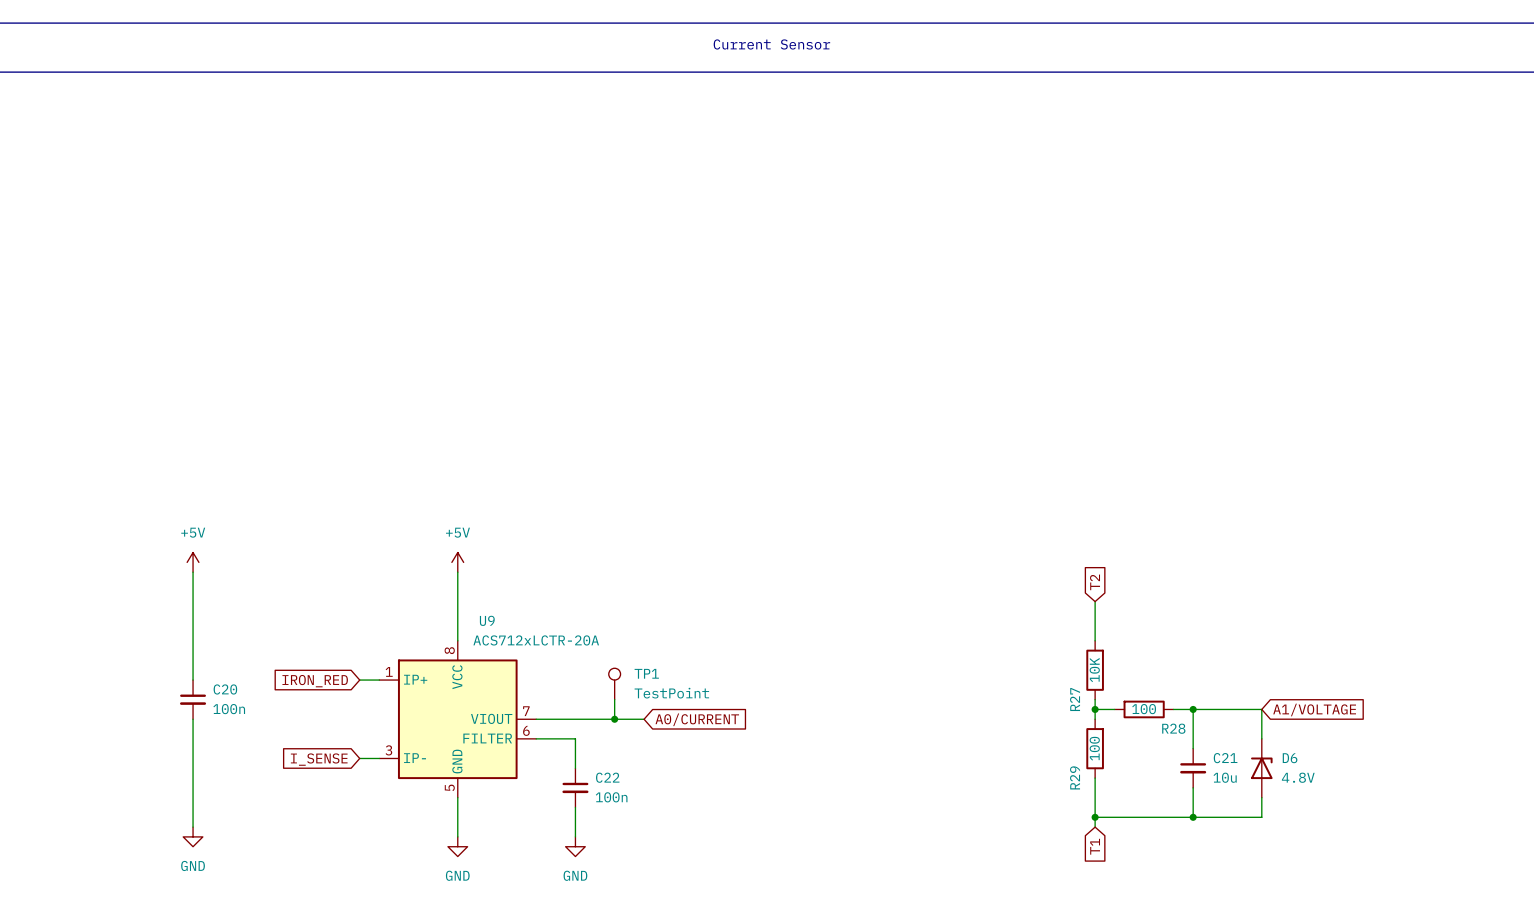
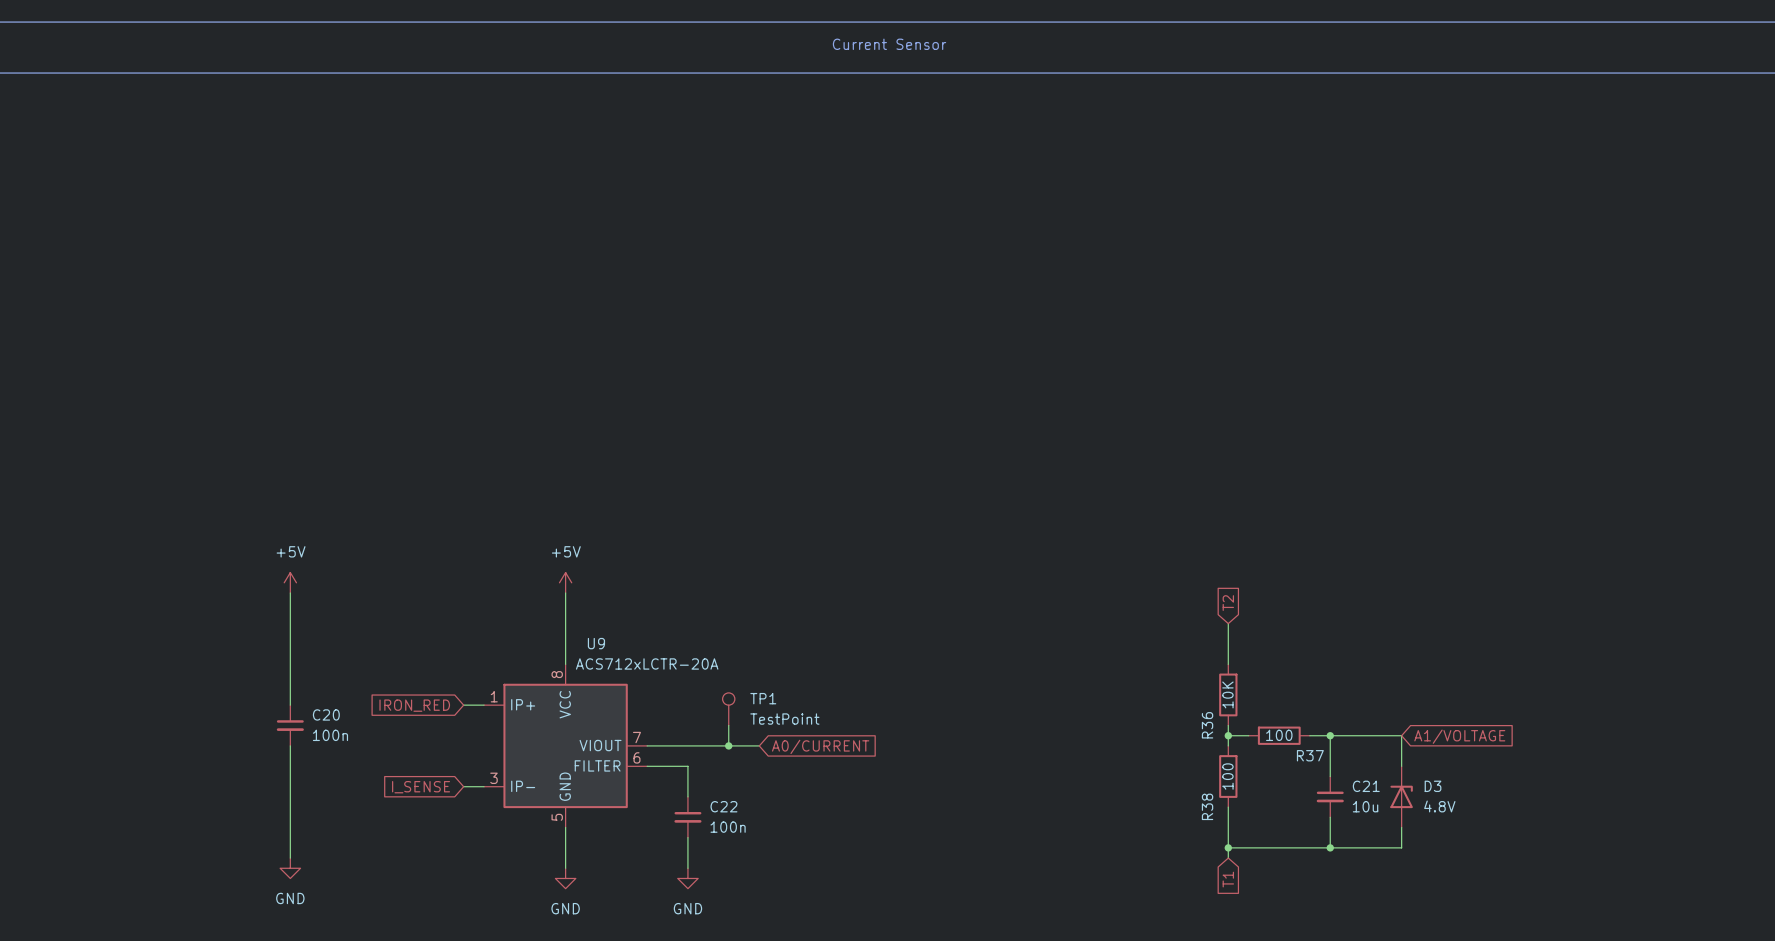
R27 name: R27 (1075, 699) -> R36 (1207, 725)
R28 name: R28 (1173, 728) -> R37 (1310, 755)
D6 name: D6 (1290, 758) -> D3 (1433, 786)
R29 name: R29 (1075, 777) -> R38 (1207, 806)

